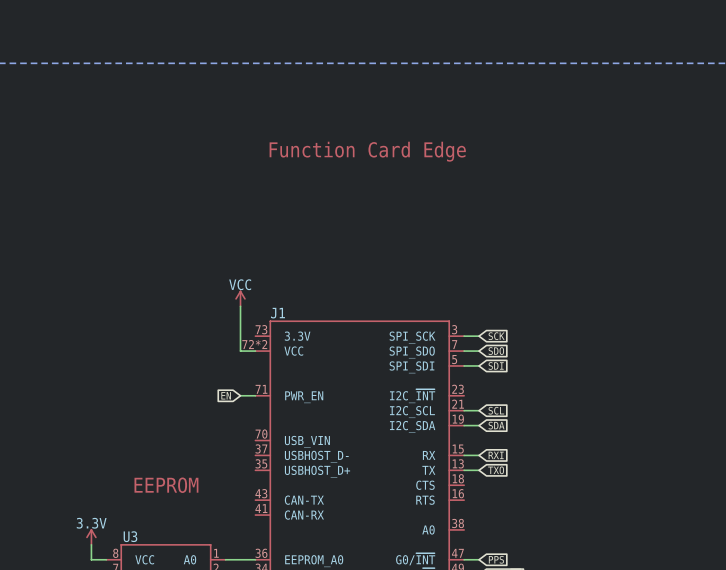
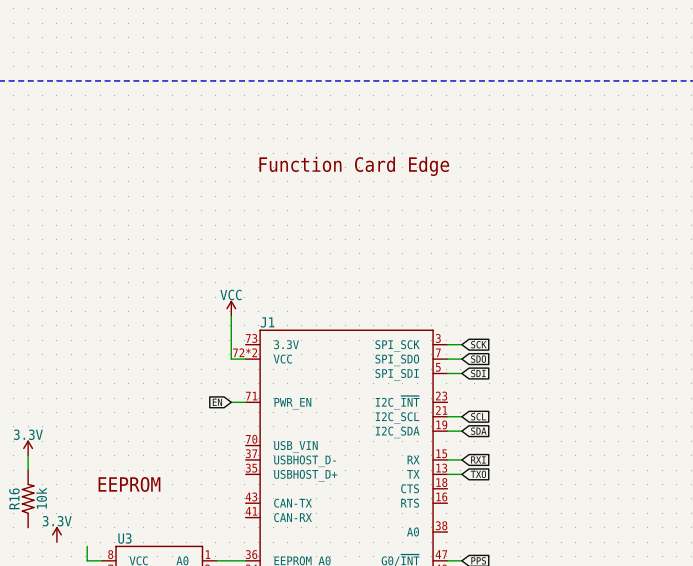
power symbol: none -> 3.3V (28, 448)
wire: none -> (28, 455) (28, 470)
text position: EEPROM (166, 485) -> EEPROM (129, 484)
R16: none -> 10k (28, 498)
power symbol position: 3.3V (91, 537) -> 3.3V (56, 534)

